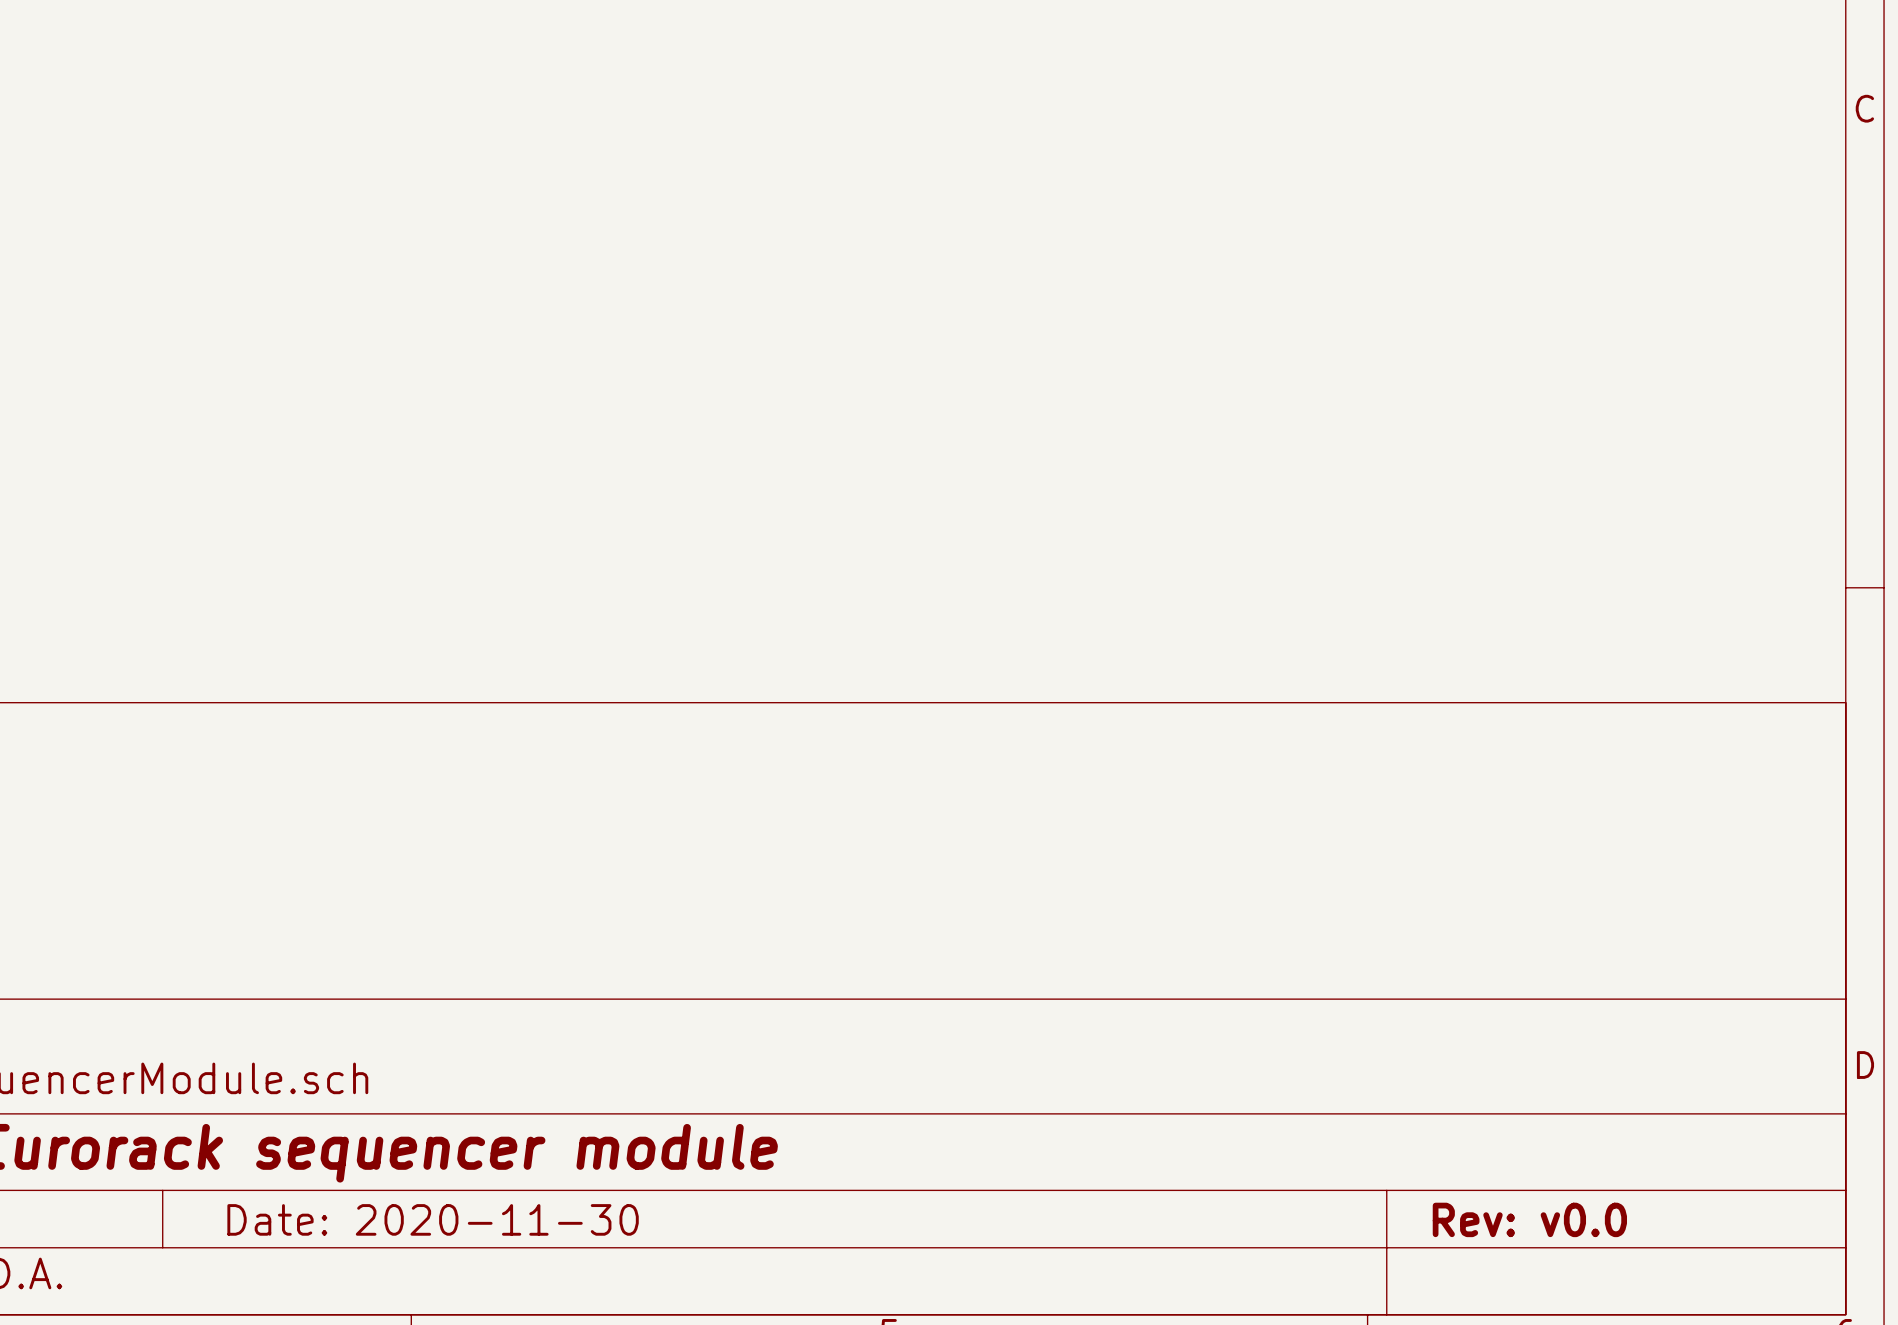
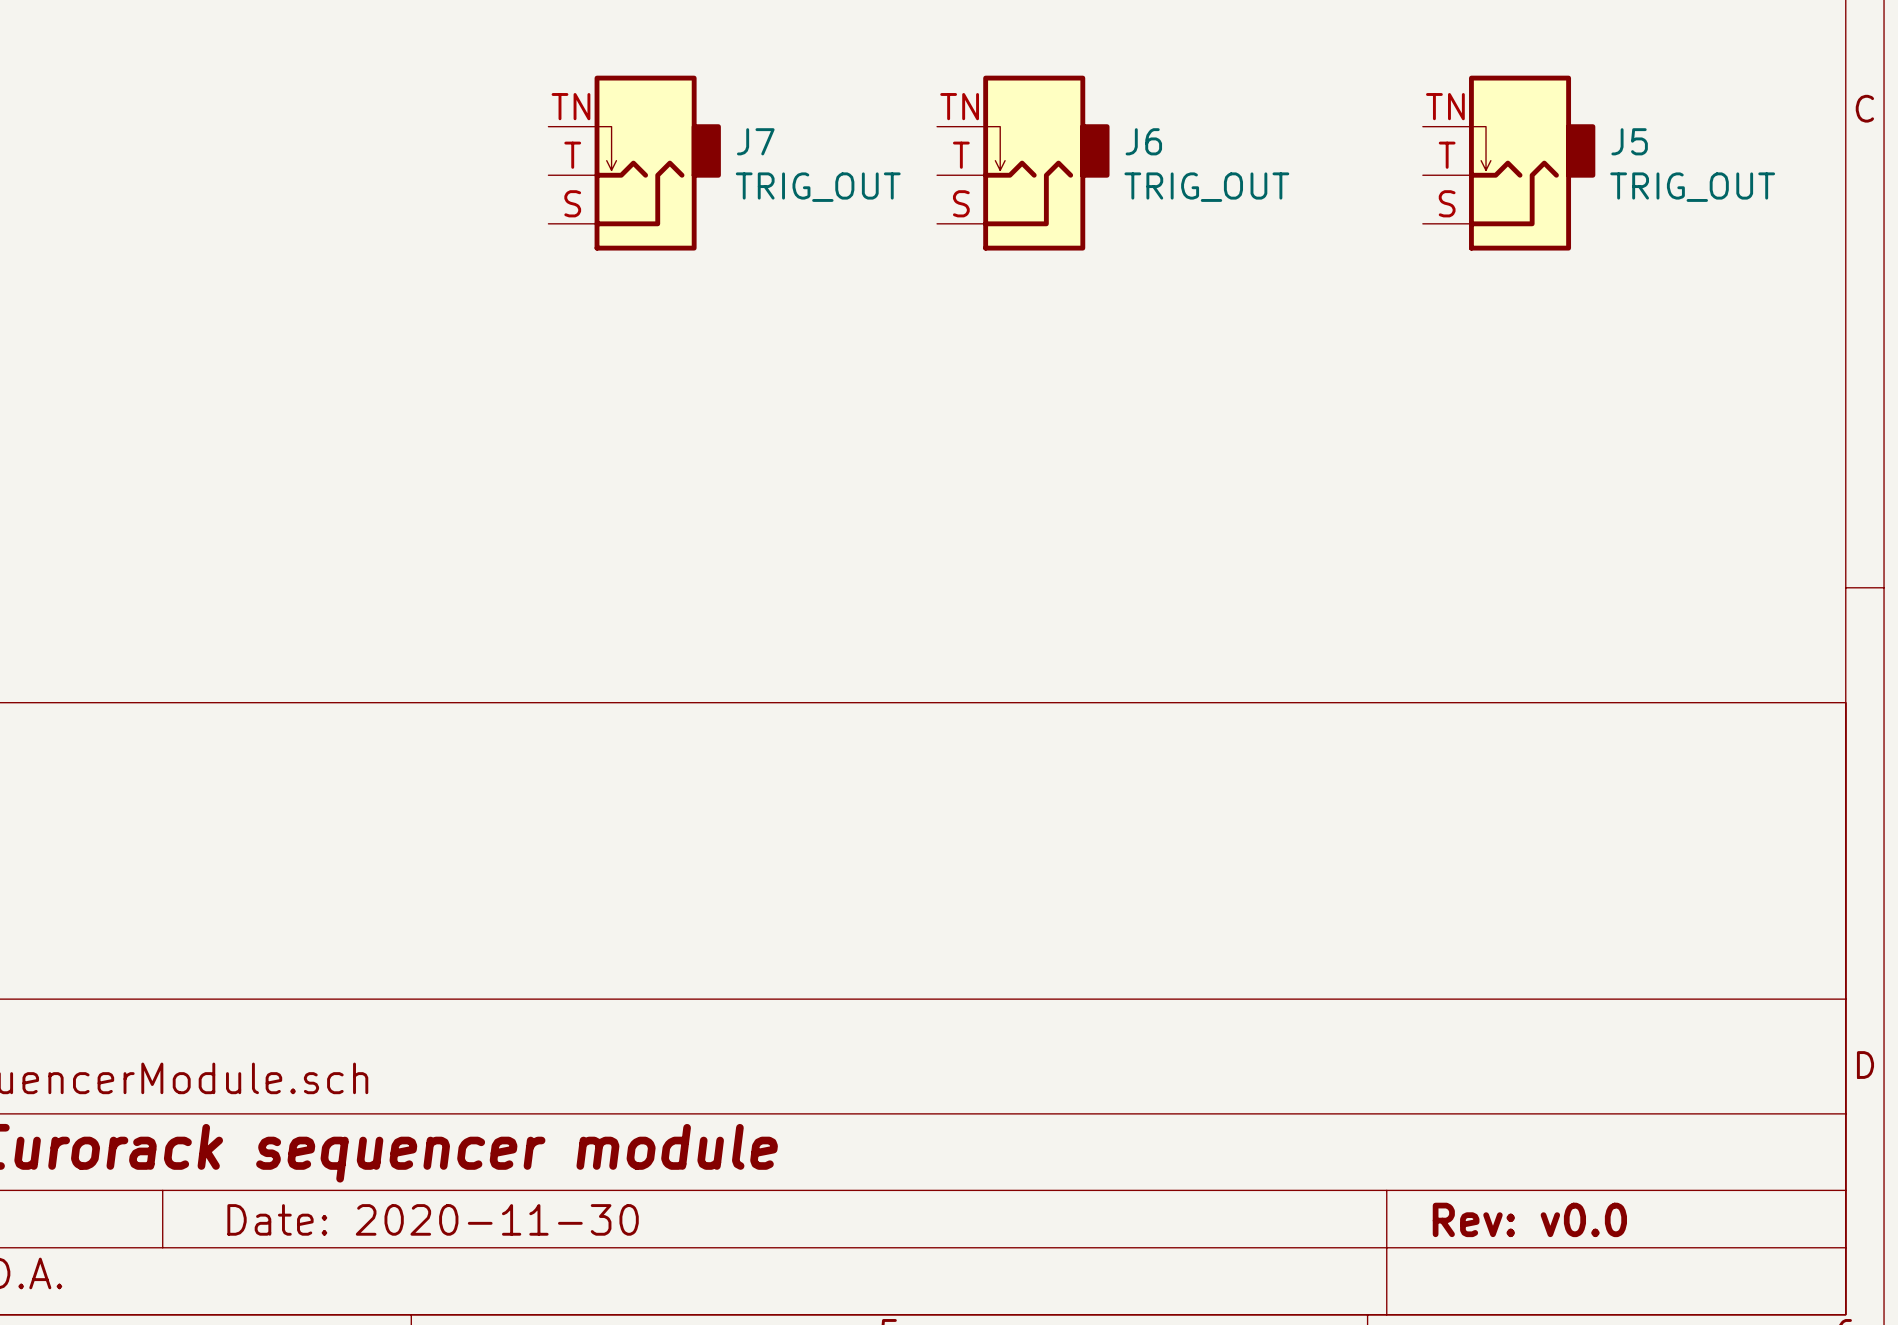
J7: none -> TRIG_OUT (634, 163)
J6: none -> TRIG_OUT (1023, 163)
J5: none -> TRIG_OUT (1509, 163)

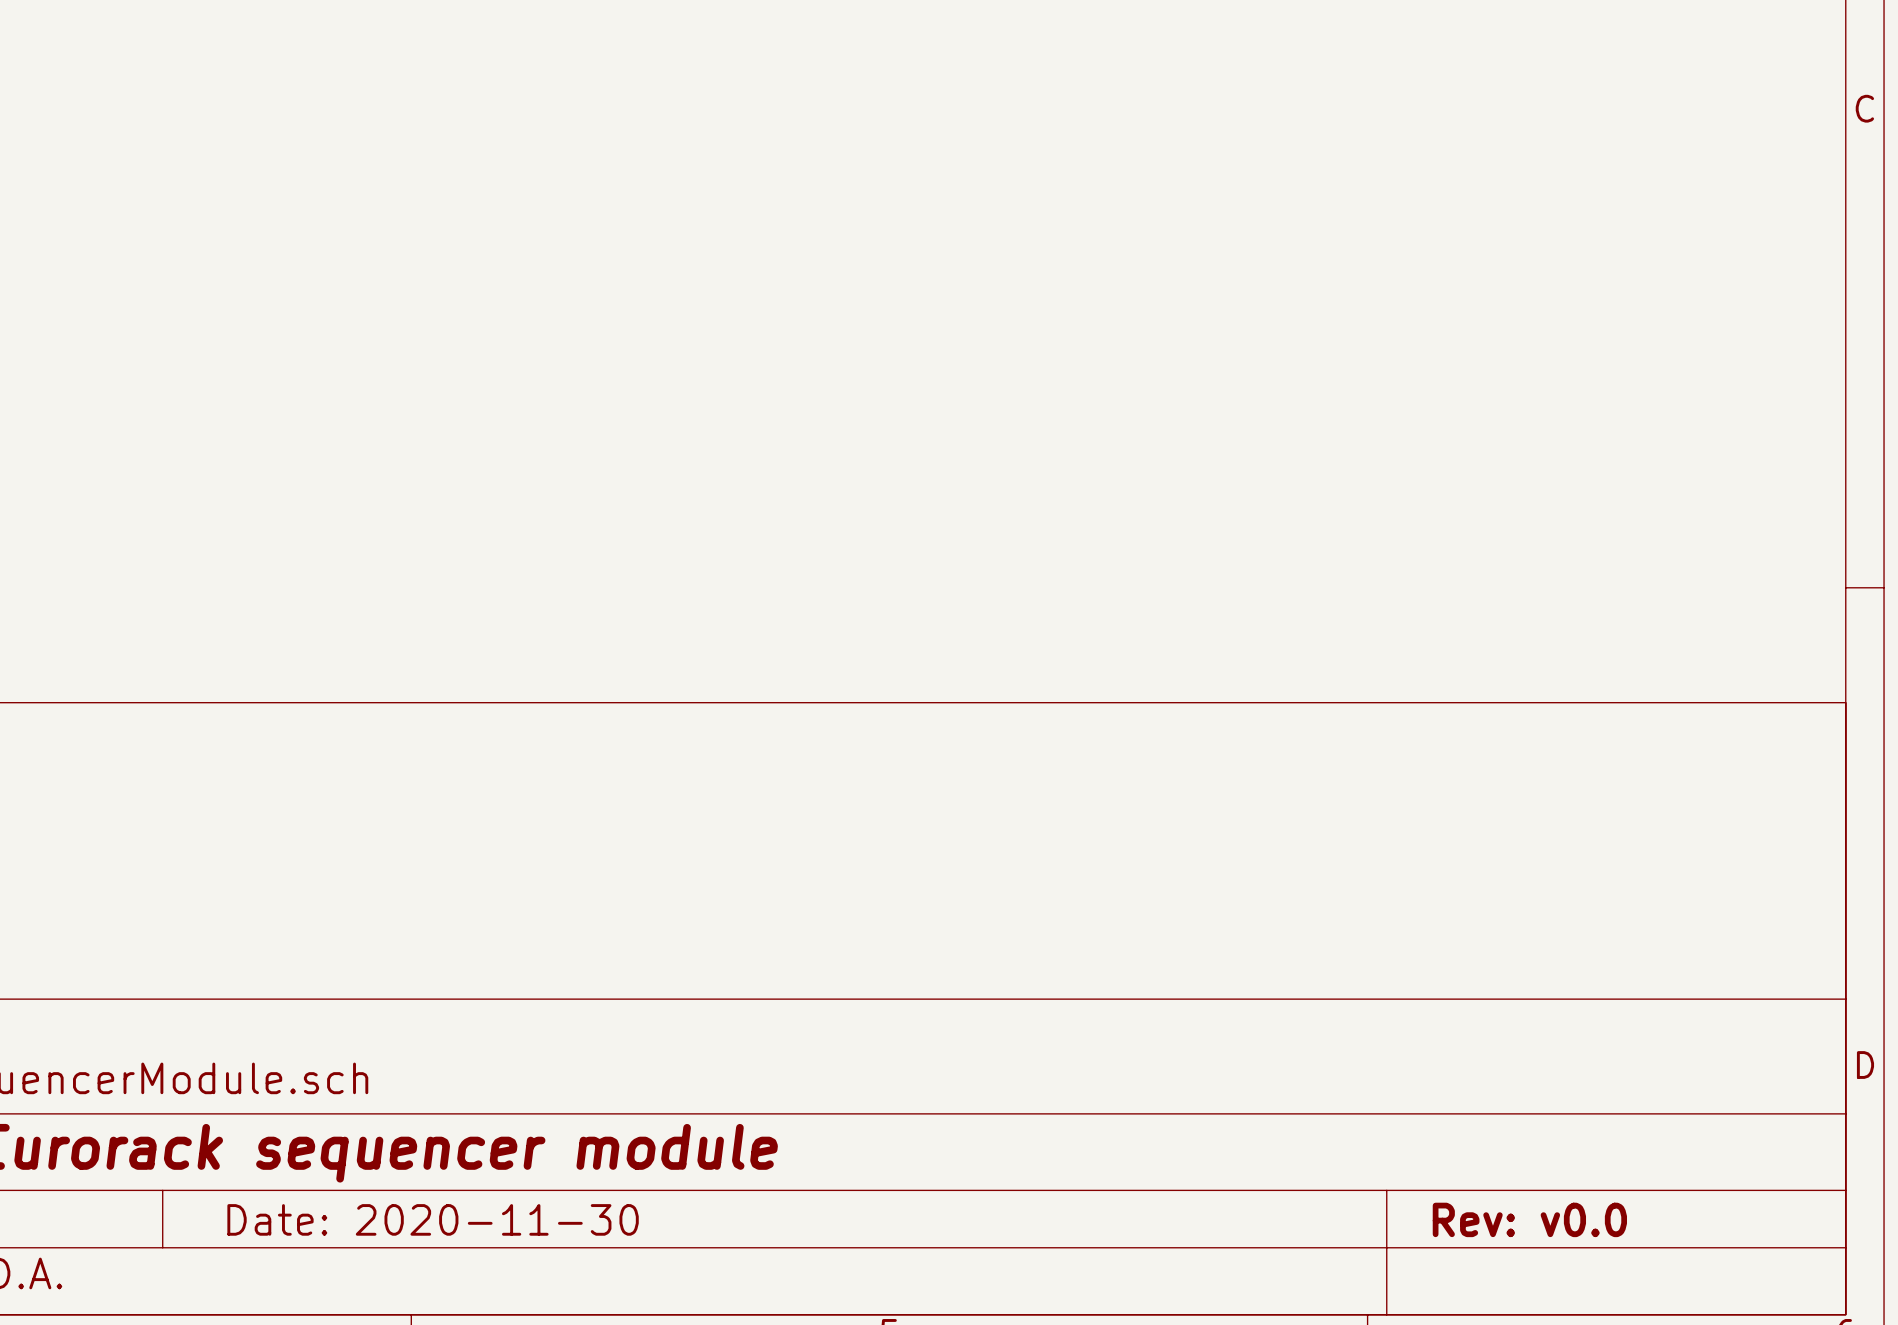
J7: TRIG_OUT (634, 163) -> none
J6: TRIG_OUT (1023, 163) -> none
J5: TRIG_OUT (1509, 163) -> none

